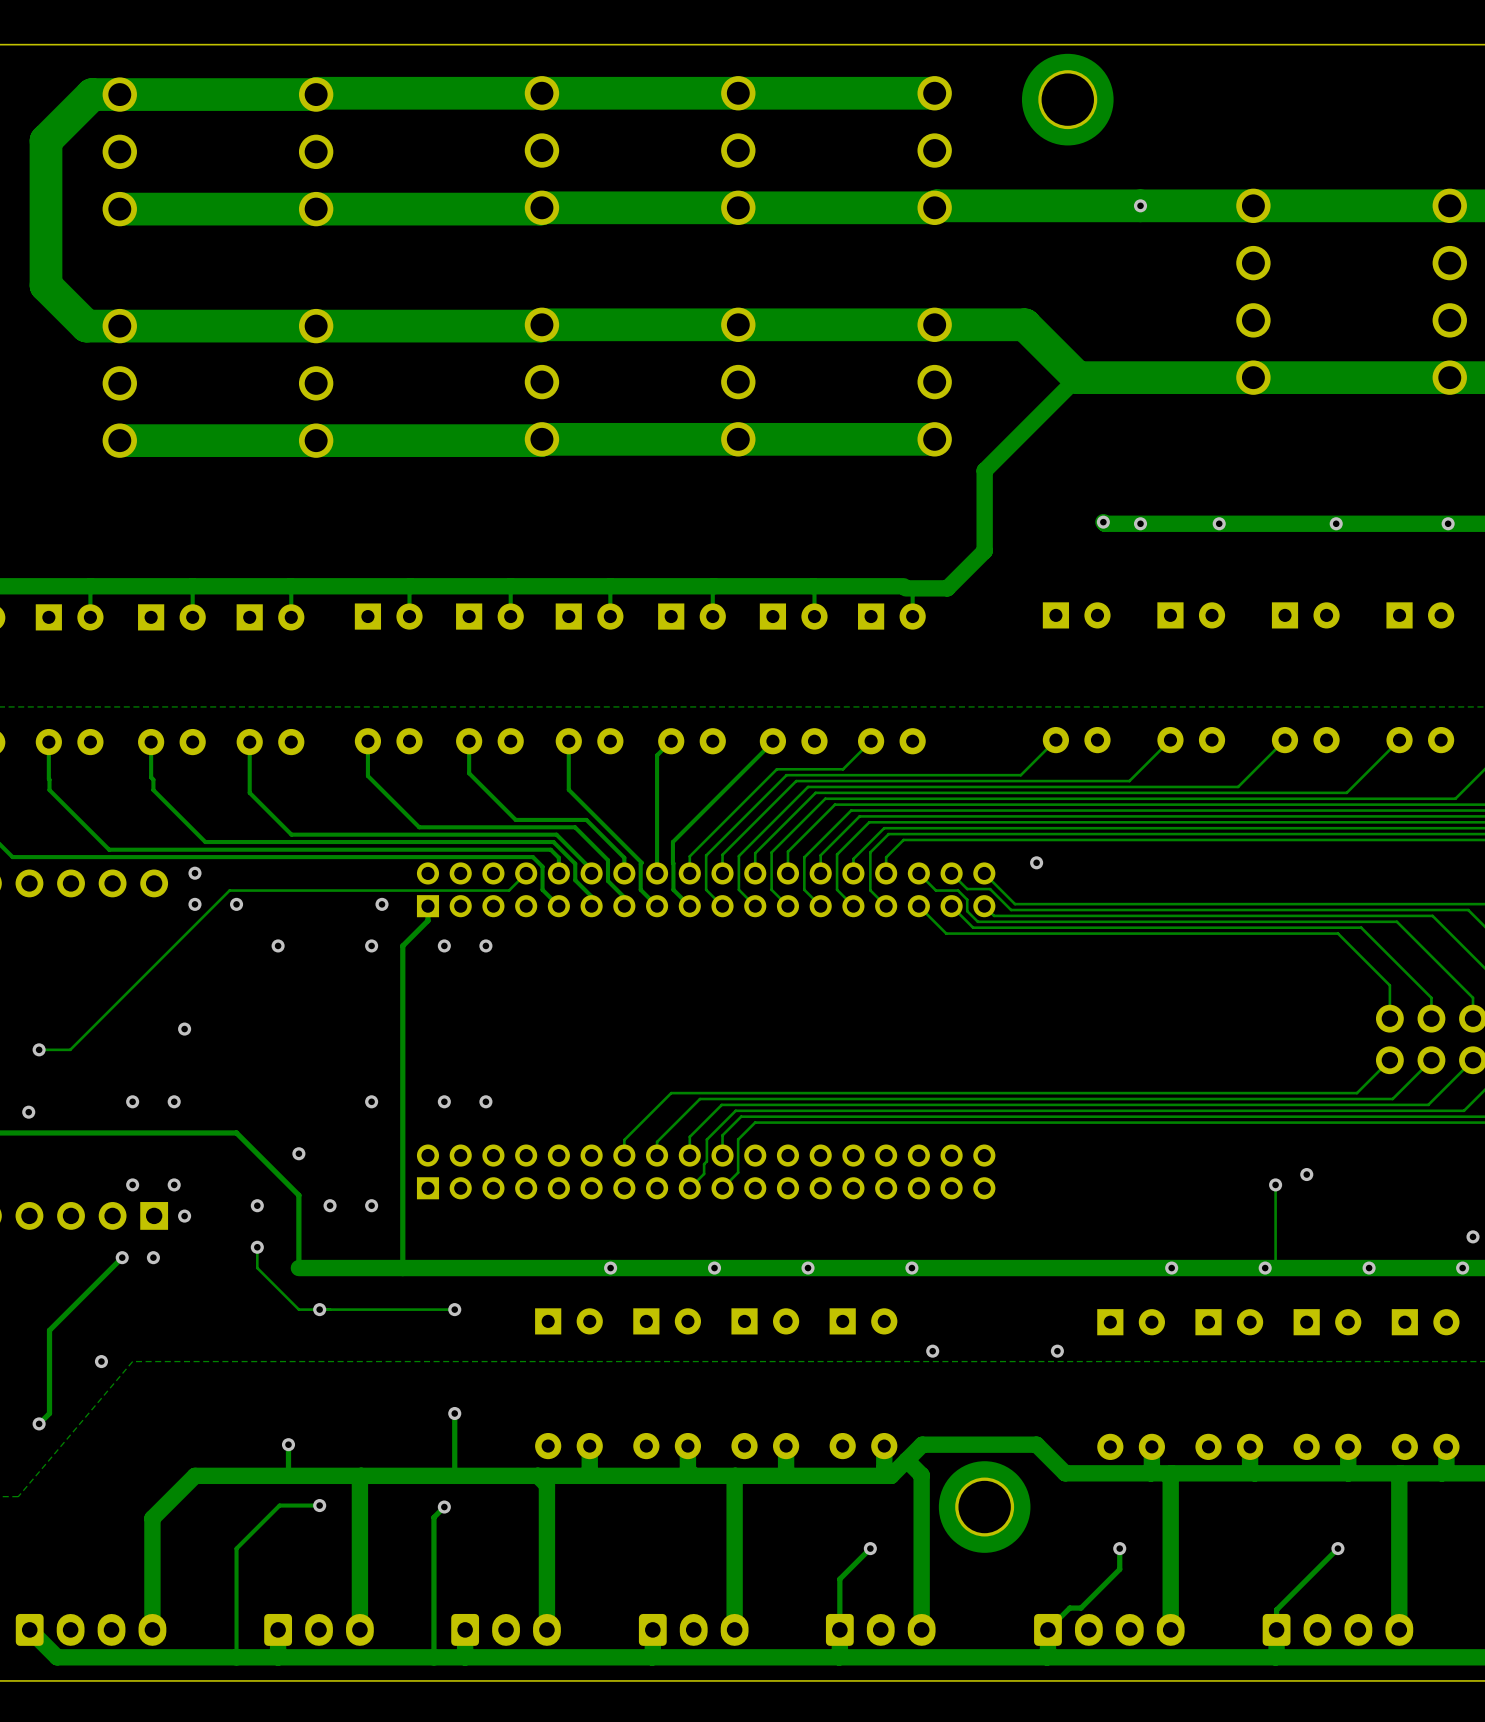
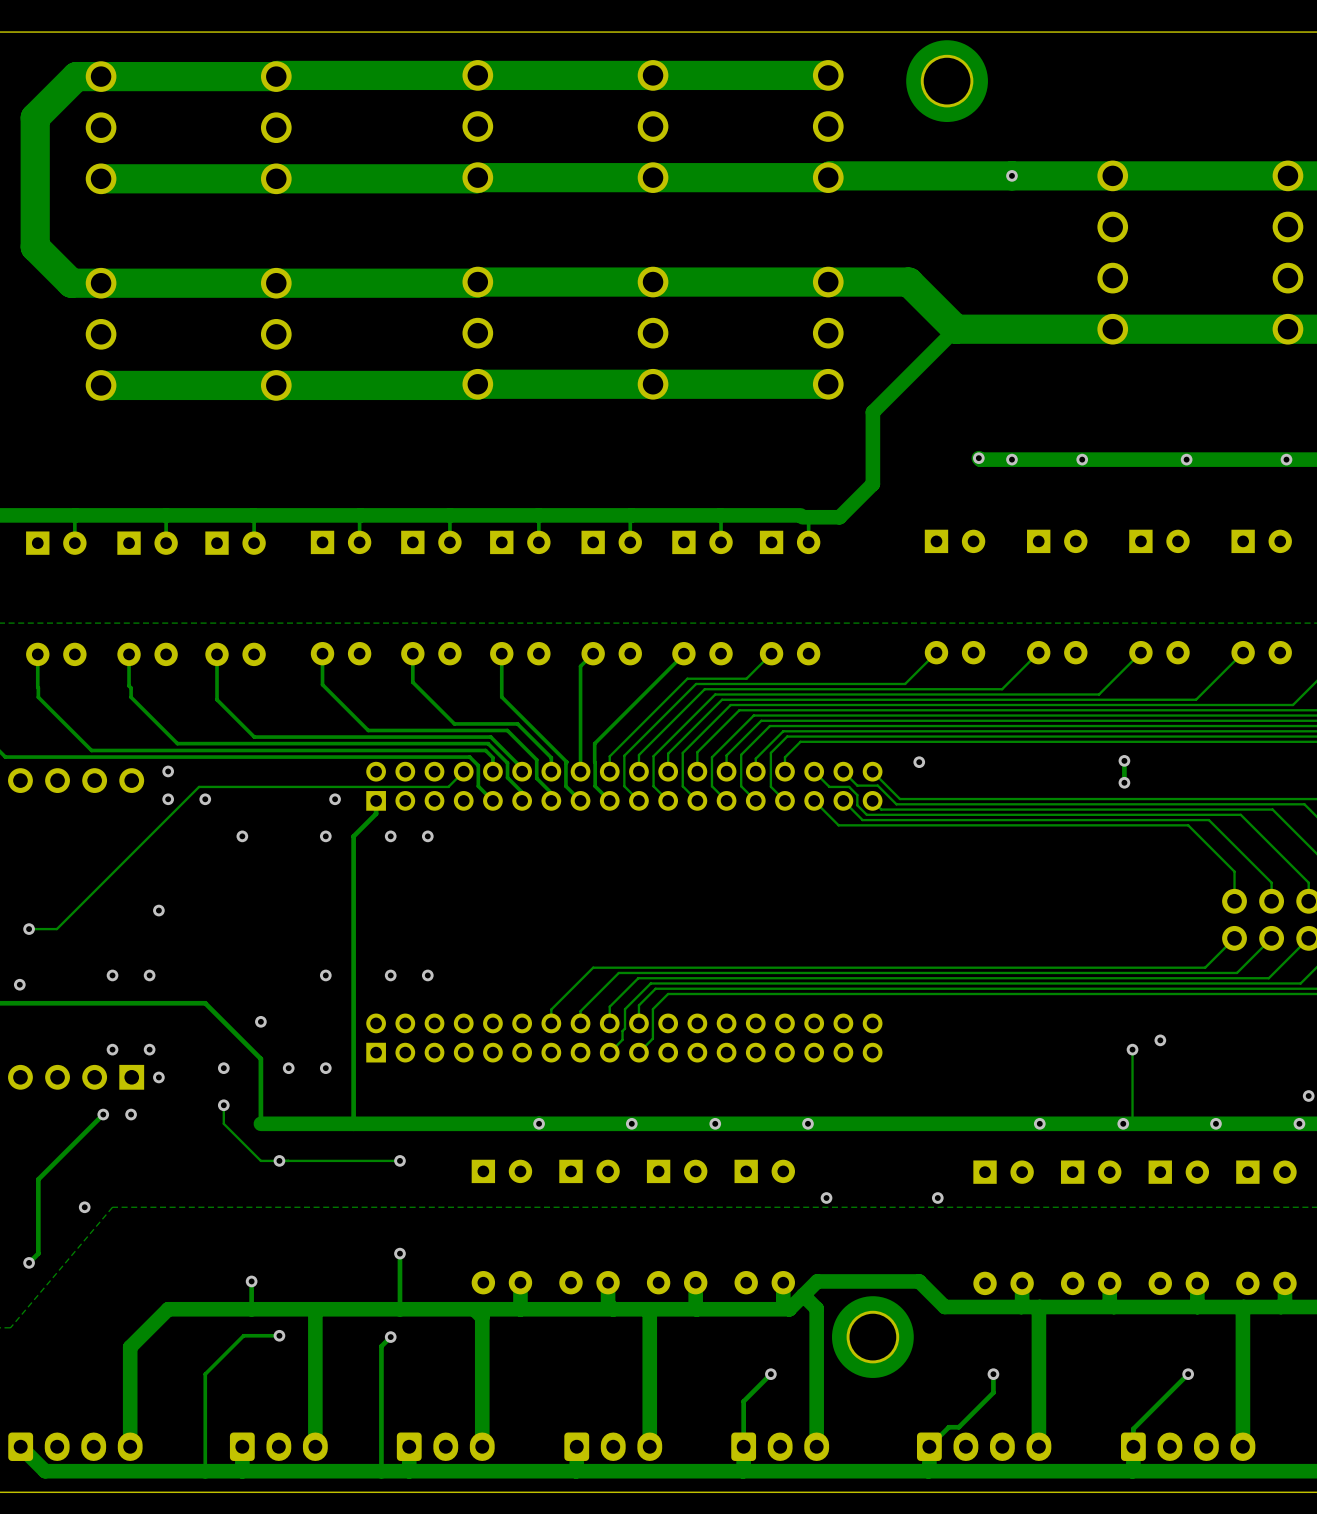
track: none -> (1124, 760) (1124, 782)
via: none -> (1124, 760)
via: none -> (1124, 782)

